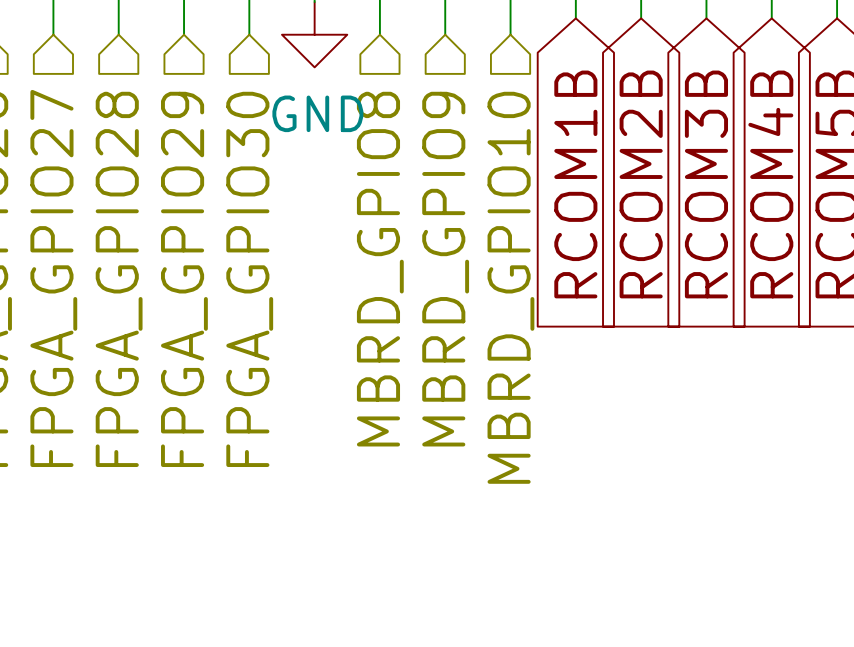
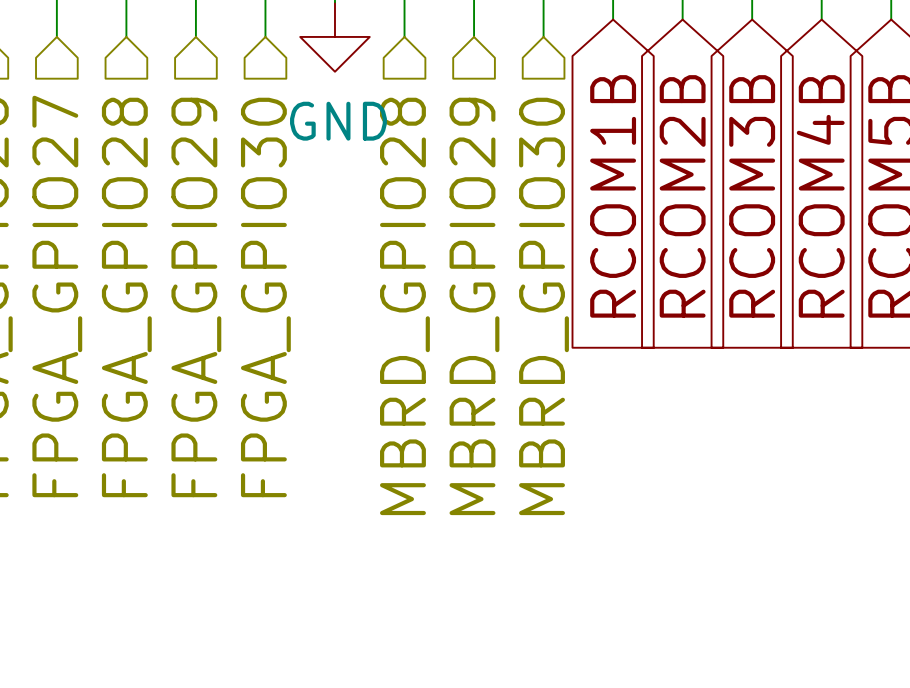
hierarchical label: MBRD_GPIO8 (380, 269) -> MBRD_GPIO28 (404, 306)
hierarchical label: MBRD_GPIO9 (445, 269) -> MBRD_GPIO29 (474, 306)
hierarchical label: MBRD_GPIO10 (510, 287) -> MBRD_GPIO30 (544, 306)

